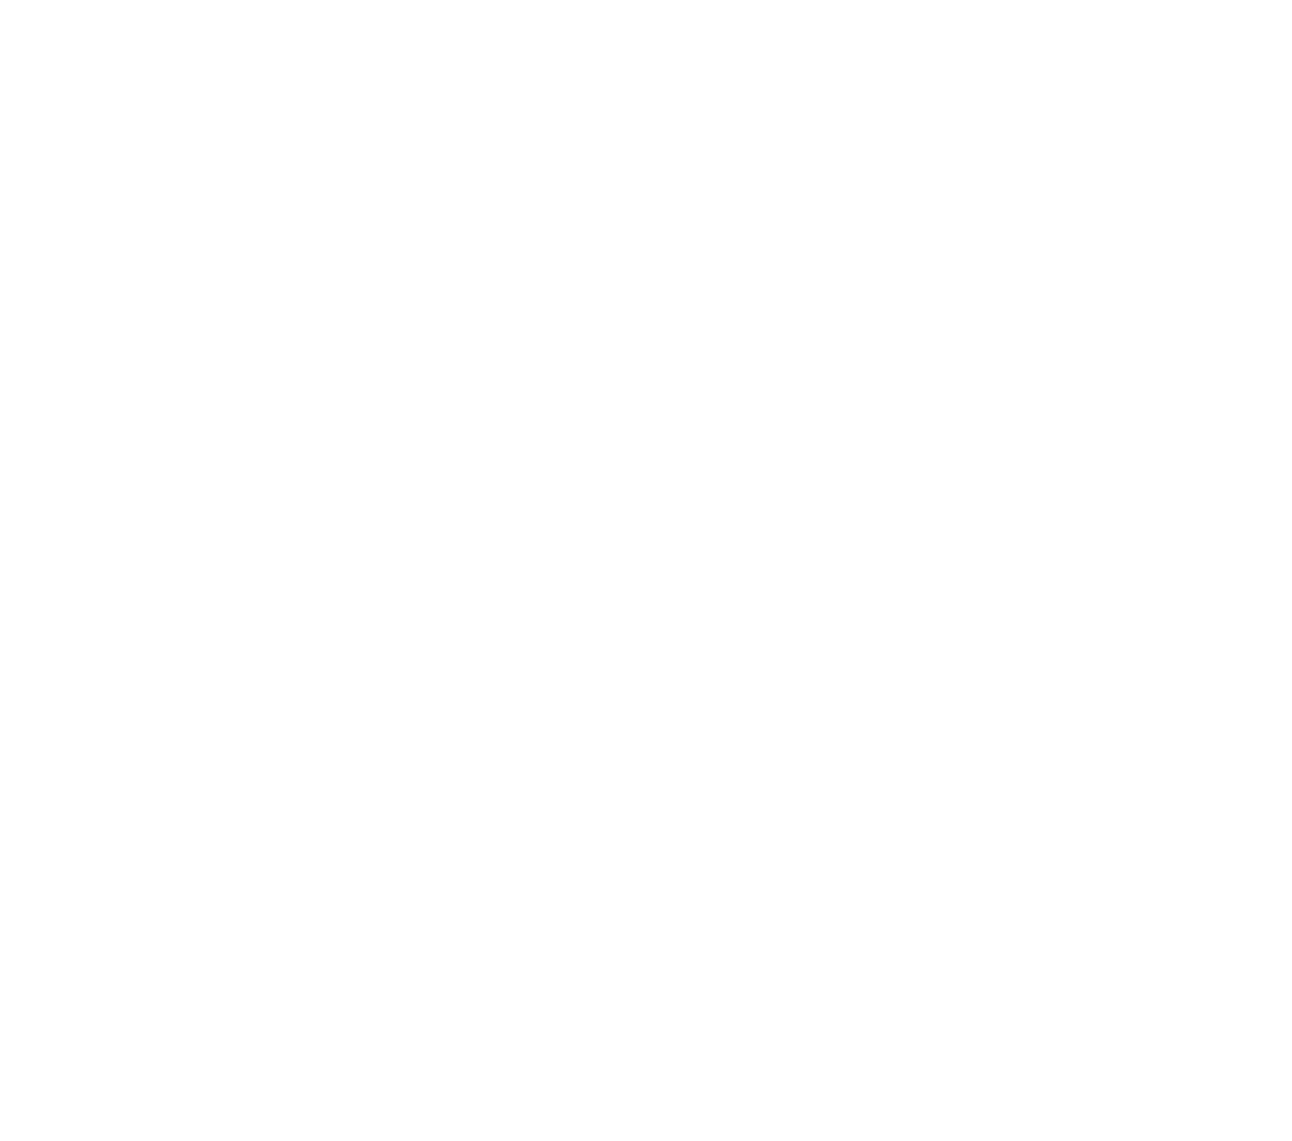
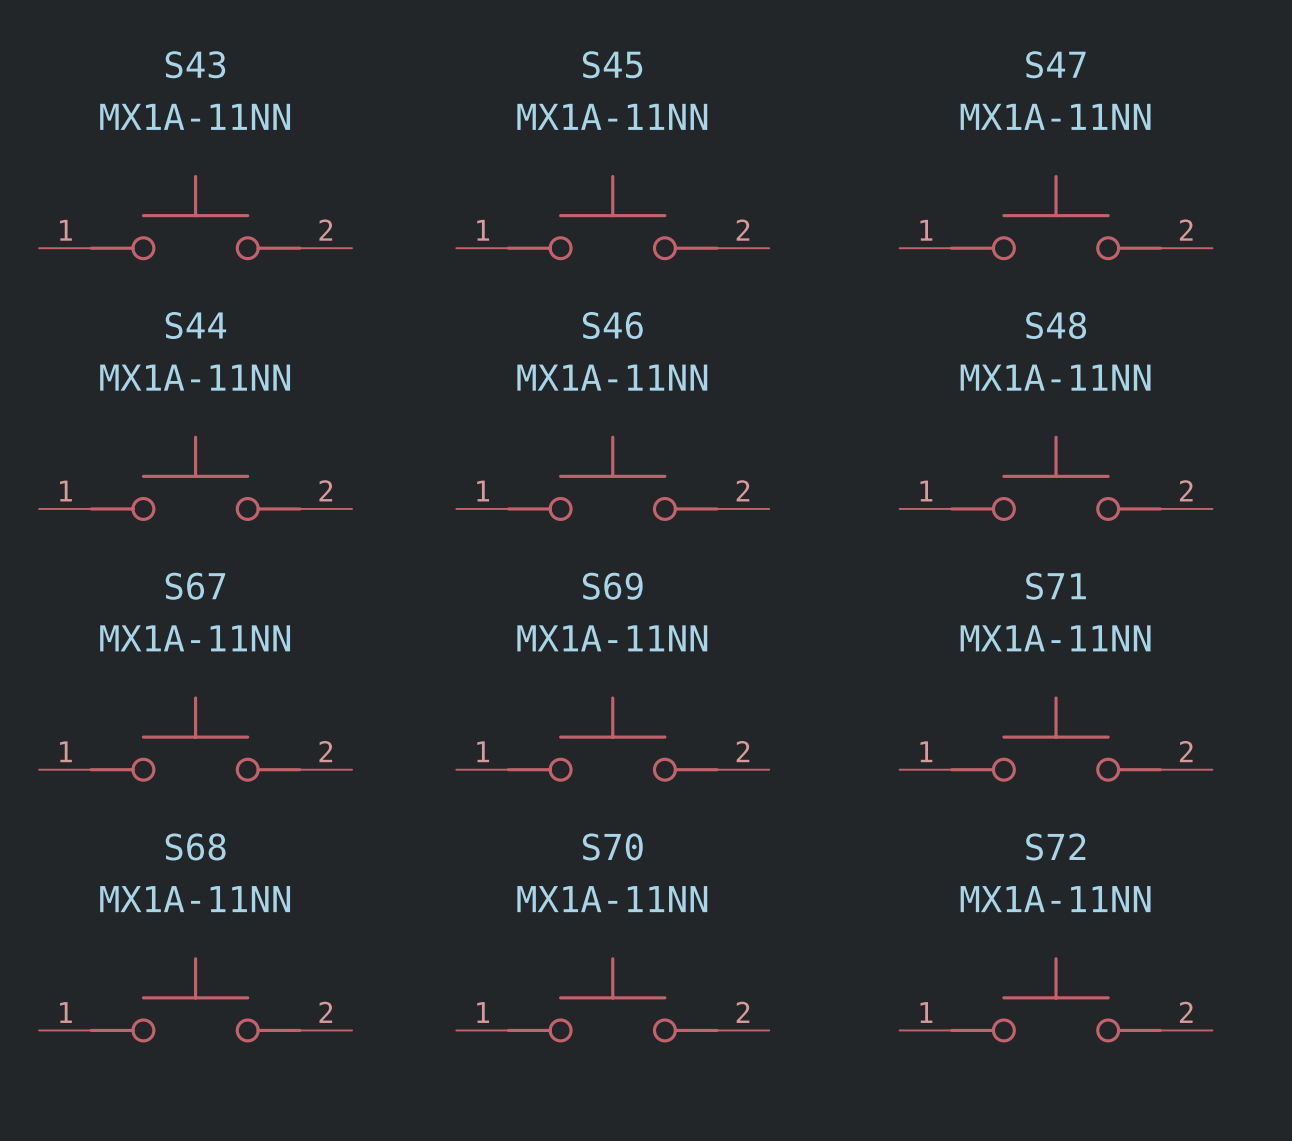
S43: none -> MX1A-11NN (195, 217)
S45: none -> MX1A-11NN (612, 217)
S47: none -> MX1A-11NN (1056, 217)
S44: none -> MX1A-11NN (195, 478)
S46: none -> MX1A-11NN (612, 478)
S48: none -> MX1A-11NN (1056, 478)
S67: none -> MX1A-11NN (195, 739)
S69: none -> MX1A-11NN (612, 739)
S71: none -> MX1A-11NN (1056, 739)
S68: none -> MX1A-11NN (195, 999)
S70: none -> MX1A-11NN (612, 999)
S72: none -> MX1A-11NN (1056, 999)

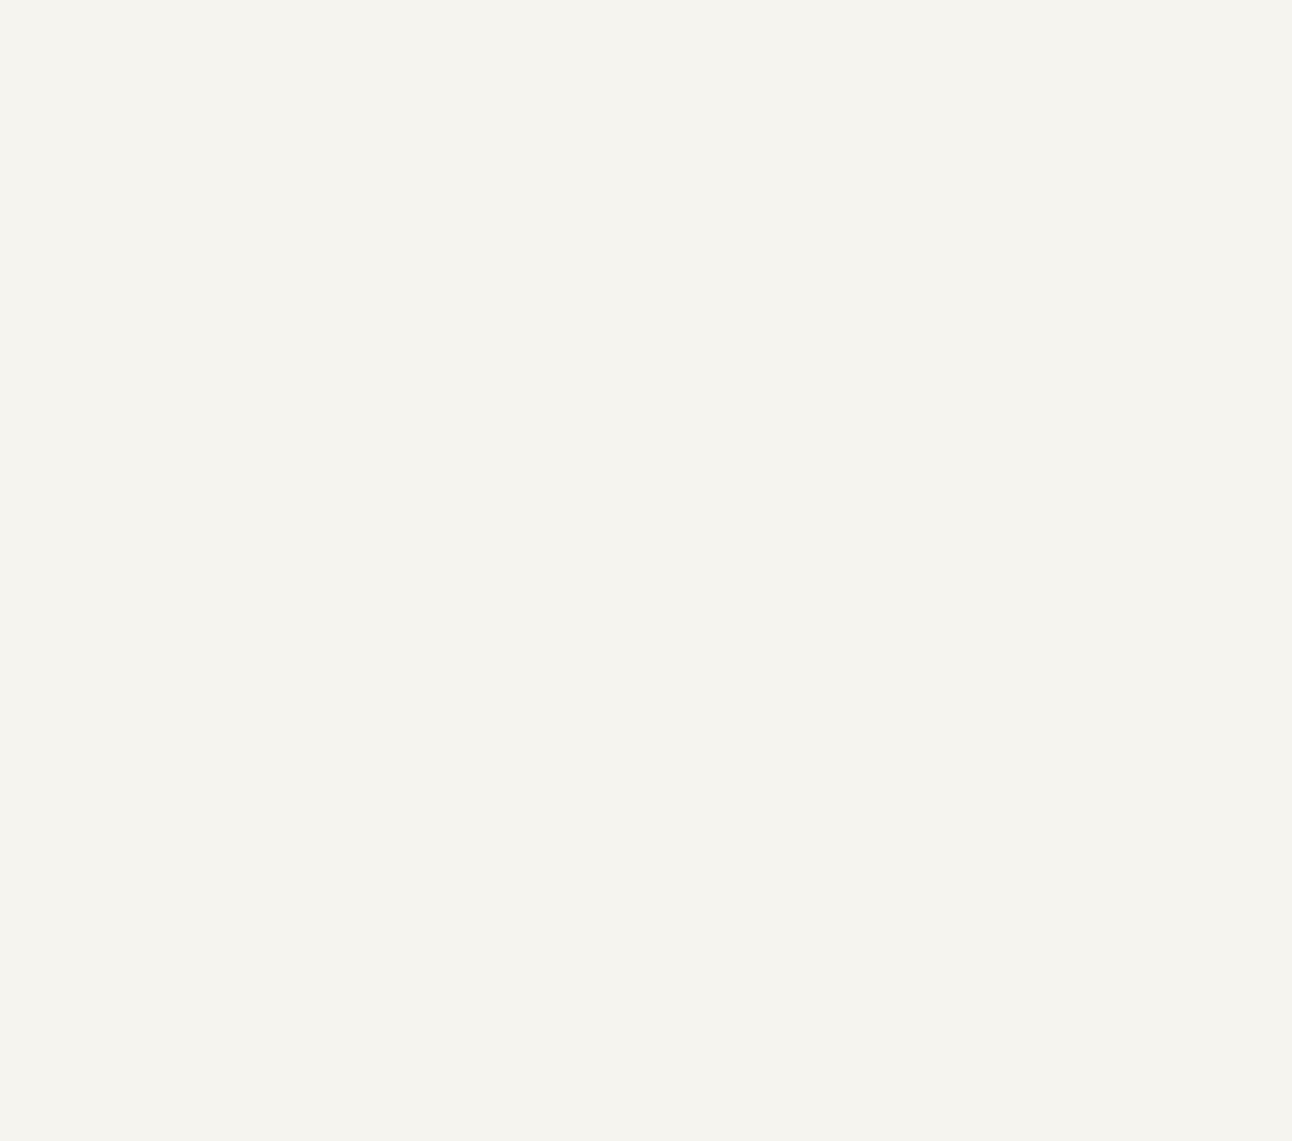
S43: MX1A-11NN (195, 217) -> none
S45: MX1A-11NN (612, 217) -> none
S47: MX1A-11NN (1056, 217) -> none
S44: MX1A-11NN (195, 478) -> none
S46: MX1A-11NN (612, 478) -> none
S48: MX1A-11NN (1056, 478) -> none
S67: MX1A-11NN (195, 739) -> none
S69: MX1A-11NN (612, 739) -> none
S71: MX1A-11NN (1056, 739) -> none
S68: MX1A-11NN (195, 999) -> none
S70: MX1A-11NN (612, 999) -> none
S72: MX1A-11NN (1056, 999) -> none

